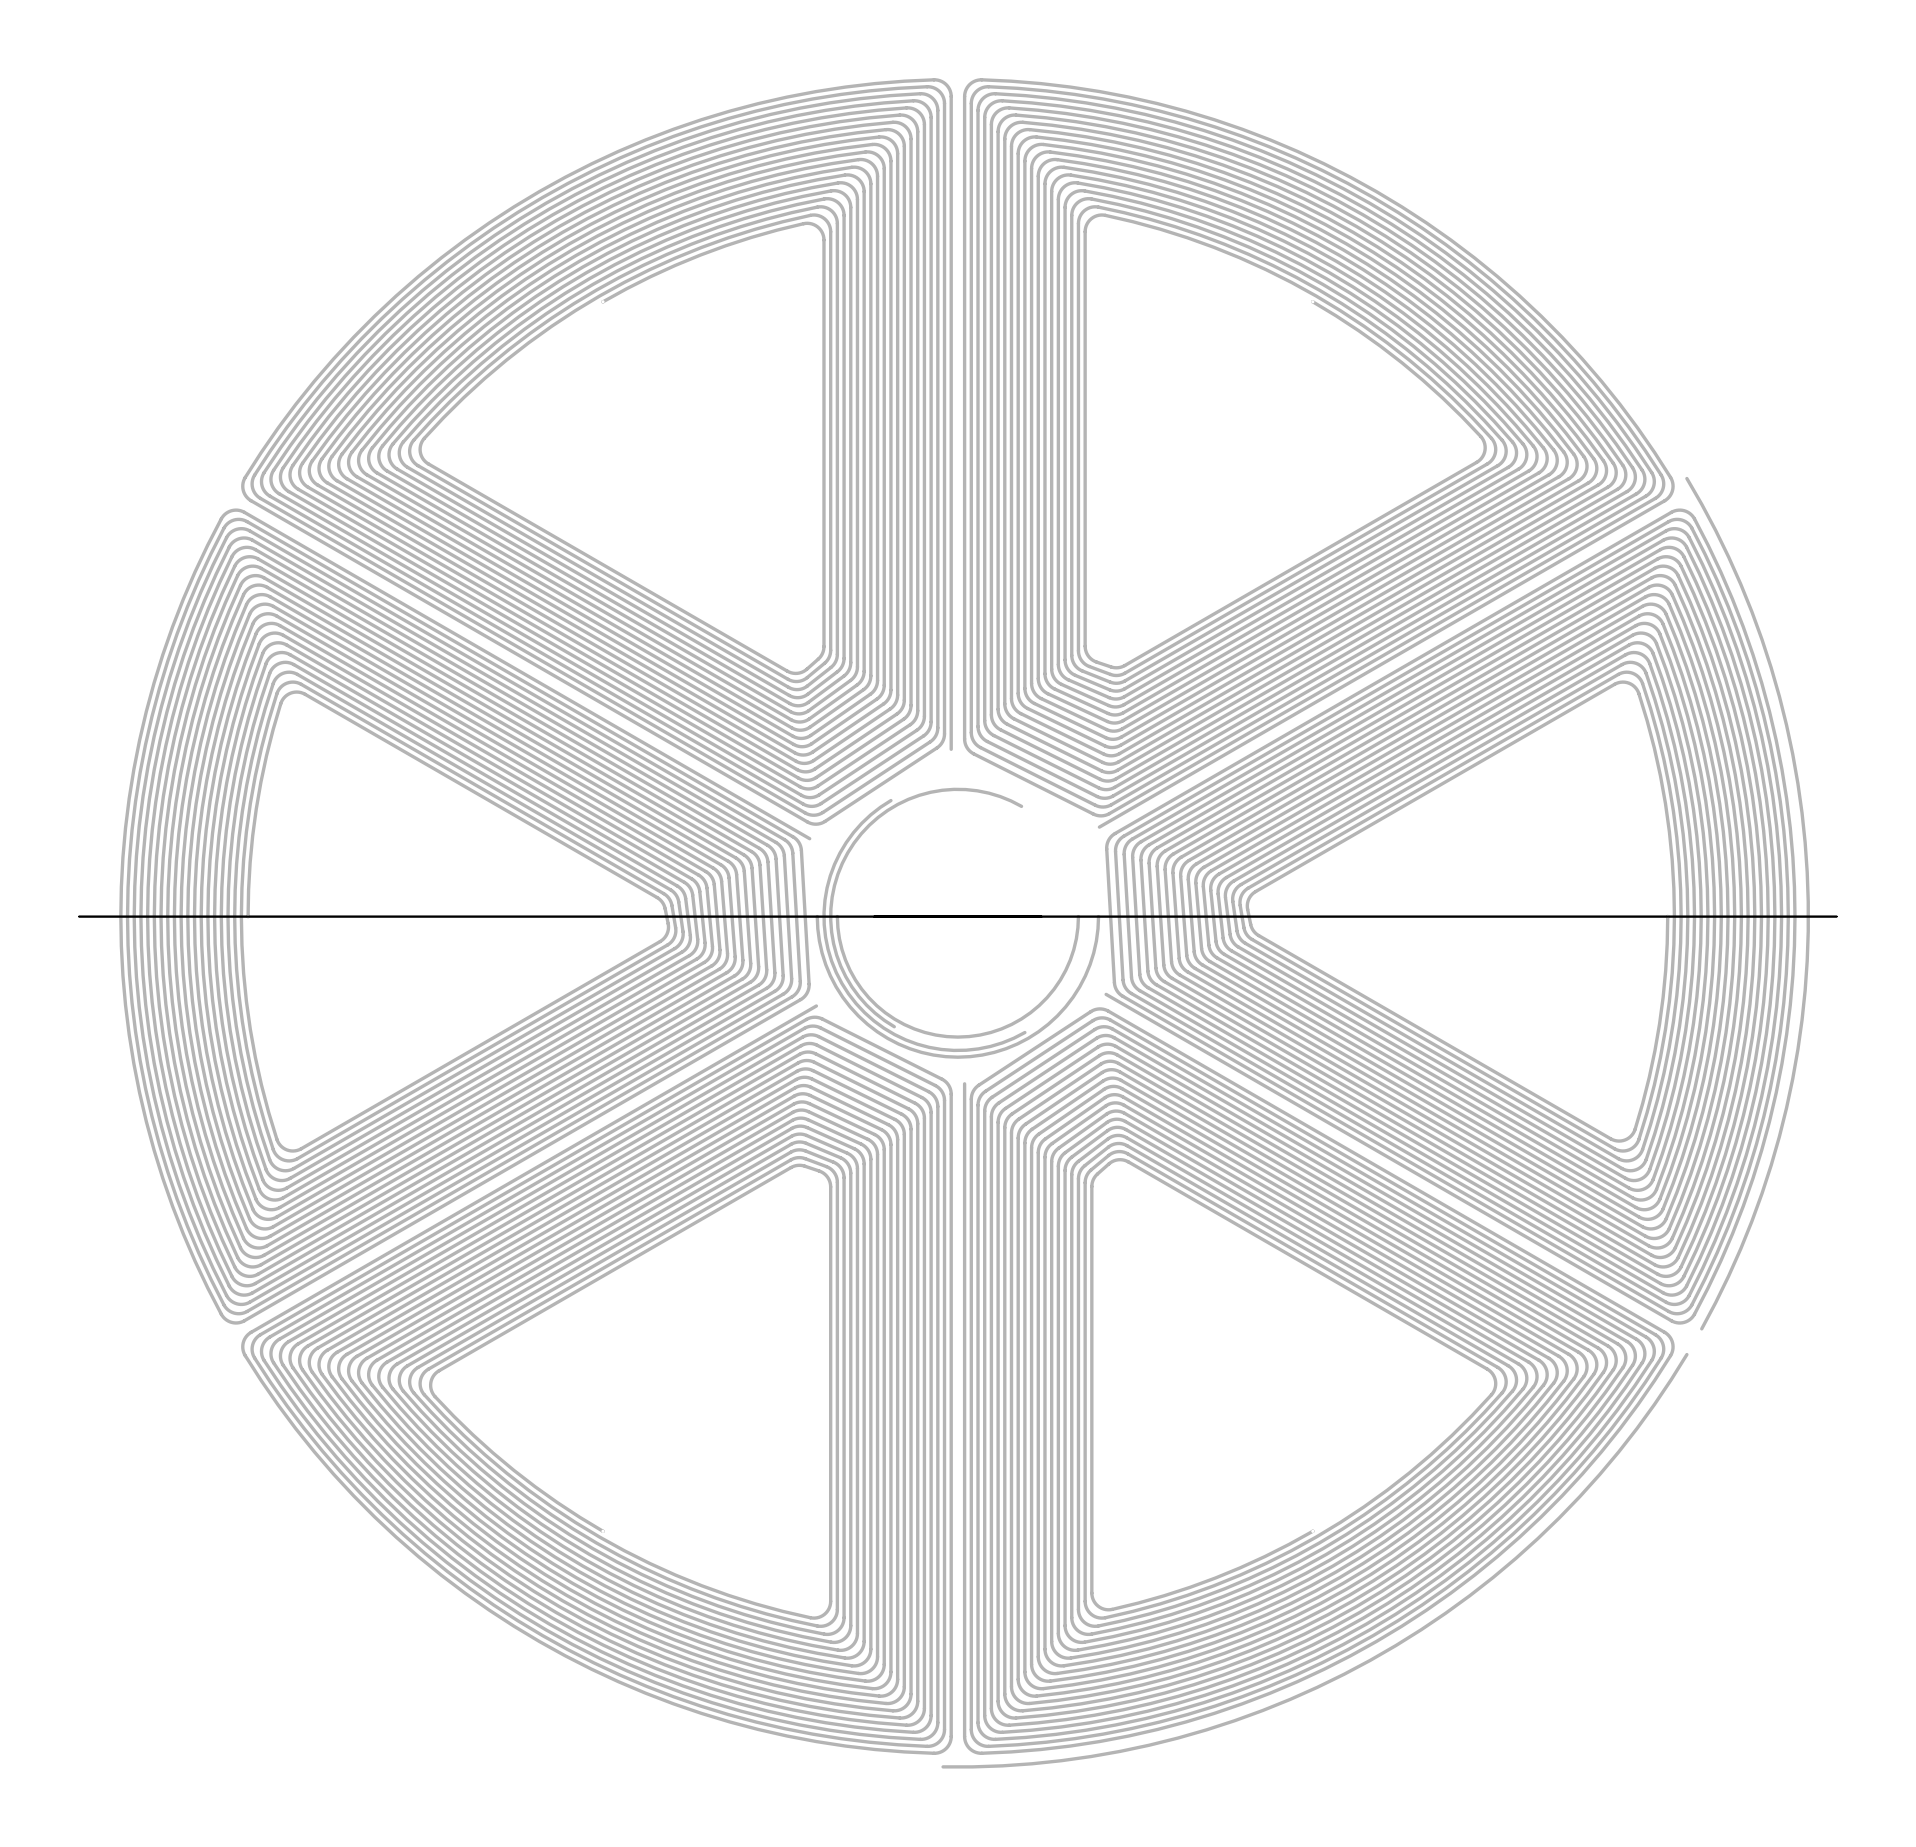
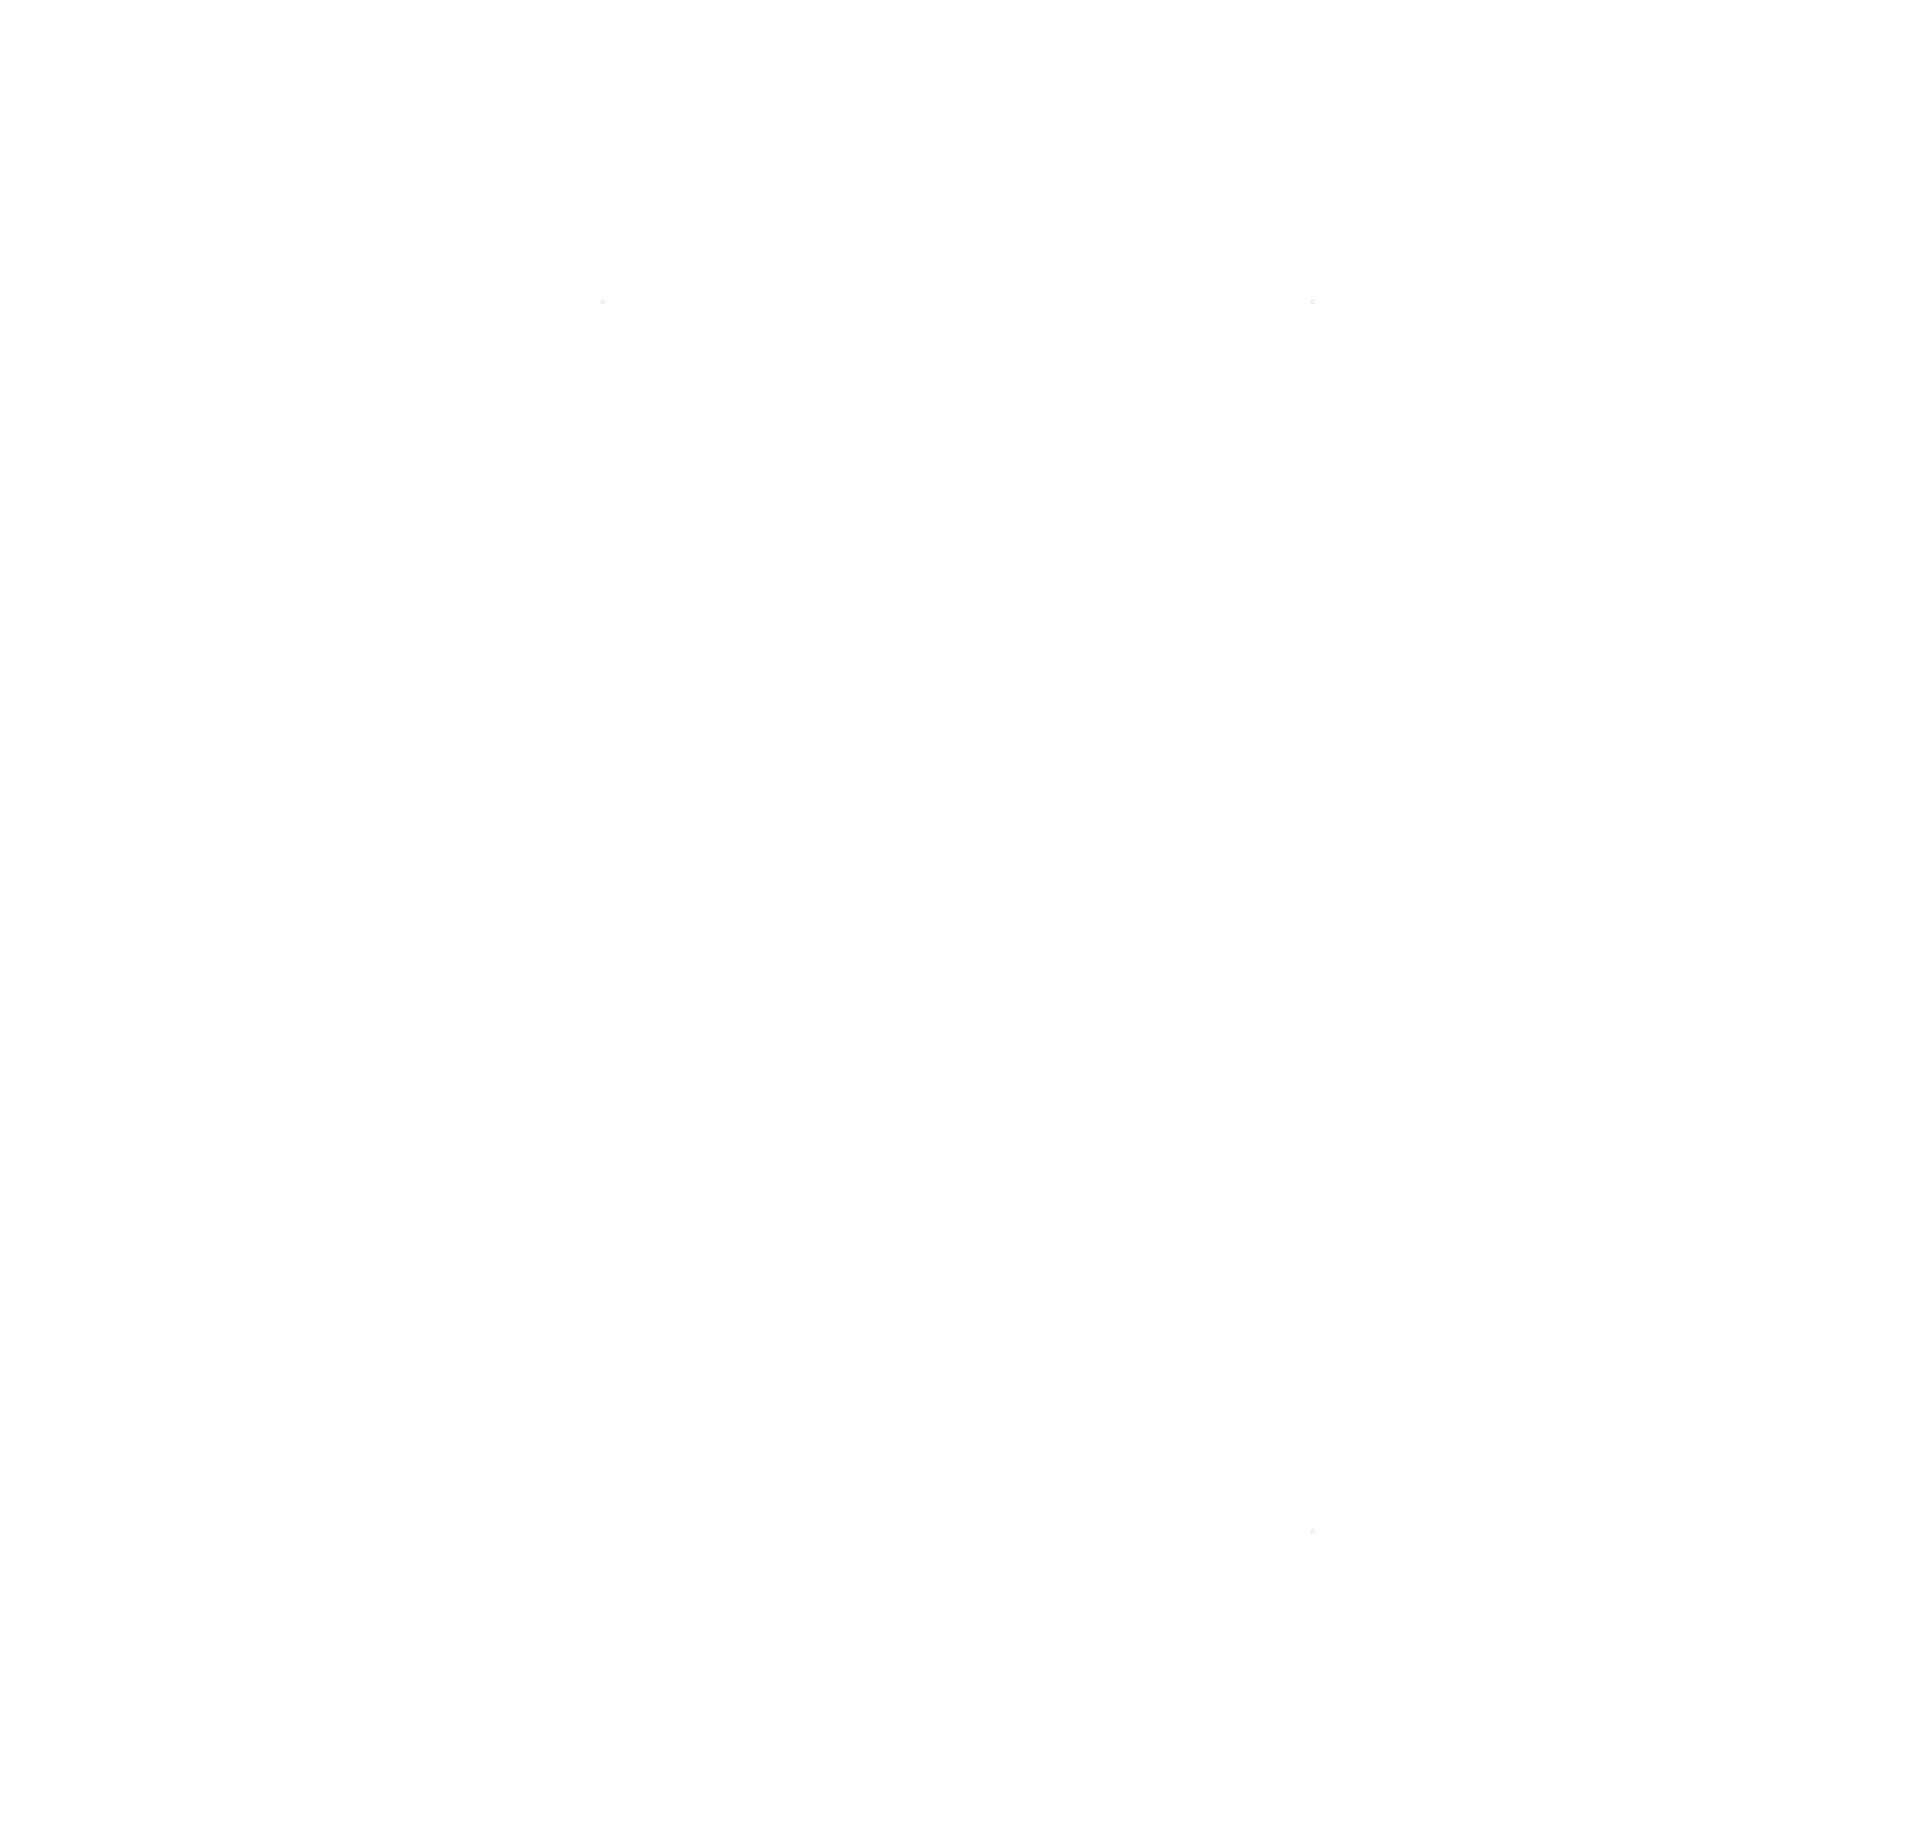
track: (602, 301) (675, 265) (751, 237) (805, 223) (814, 224) (821, 231) (823, 240) (823, 646) (819, 657) (801, 672) (793, 673) (787, 671) (428, 463) (422, 458) (420, 447) (423, 439) (443, 417) (506, 360) (575, 310) (624, 282) (701, 247) (755, 229) (812, 215) (820, 216) (828, 223) (830, 231) (830, 652) (825, 662) (801, 680) (788, 679) (418, 465) (411, 457) (409, 449) (412, 441) (431, 420) (488, 366) (551, 318) (619, 277) (691, 244) (766, 219) (819, 206) (827, 208) (835, 215) (837, 223) (837, 656) (832, 666) (803, 688) (796, 689) (788, 687) (407, 467) (400, 459) (399, 451) (403, 442) (440, 401) (502, 346) (569, 298) (617, 271) (692, 236) (770, 211) (826, 198) (836, 201) (842, 207) (844, 215) (843, 660) (838, 670) (804, 696) (796, 697) (789, 695) (397, 469) (390, 461) (389, 453) (391, 445) (411, 422) (473, 361) (541, 309) (589, 278) (666, 240) (747, 210) (833, 190) (841, 192) (848, 199) (850, 207) (850, 664) (845, 674) (804, 704) (797, 705) (789, 703) (387, 471) (381, 465) (378, 455) (382, 445) (418, 405) (476, 350) (540, 301) (586, 272) (658, 236) (733, 207) (785, 193) (838, 182) (848, 184) (855, 191) (857, 199) (857, 668) (852, 679) (805, 712) (797, 713) (790, 711) (377, 472) (371, 467) (368, 457) (372, 447) (408, 405) (469, 347) (512, 312) (582, 267) (657, 229) (736, 200) (790, 185) (844, 175) (854, 176) (862, 183) (864, 191) (864, 673) (858, 683) (805, 720) (798, 722) (791, 719) (366, 474) (360, 467) (358, 457) (362, 450) (399, 405) (461, 345) (530, 292) (604, 247) (683, 211) (766, 184) (851, 167) (861, 168) (868, 176) (870, 183) (870, 677) (865, 688) (808, 728) (801, 730) (792, 727) (356, 476) (350, 469) (348, 459) (352, 452) (369, 430) (405, 389) (464, 333) (529, 284) (600, 242) (674, 207) (751, 181) (804, 168) (858, 159) (868, 161) (875, 168) (877, 176) (877, 682) (871, 693) (809, 736) (801, 738) (792, 736) (347, 478) (340, 471) (338, 461) (342, 454) (377, 410) (436, 349) (501, 295) (572, 249) (622, 223) (674, 200) (754, 173) (809, 160) (865, 152) (875, 153) (882, 160) (884, 168) (884, 687) (876, 699) (810, 744) (800, 746) (793, 744) (337, 480) (330, 473) (328, 463) (332, 456) (368, 410) (428, 347) (496, 291) (569, 243) (621, 216) (674, 193) (757, 165) (814, 153) (872, 144) (882, 146) (889, 153) (890, 161) (890, 692) (883, 703) (811, 753) (801, 755) (794, 752) (327, 482) (320, 475) (319, 465) (322, 458) (338, 436) (374, 394) (432, 335) (496, 283) (566, 238) (639, 200) (691, 179) (743, 162) (797, 149) (879, 137) (888, 138) (895, 145) (897, 153) (897, 697) (890, 708) (810, 762) (803, 763) (795, 761) (317, 485) (310, 477) (309, 468) (312, 460) (329, 437) (365, 393) (425, 332) (491, 278) (562, 232) (638, 193) (691, 172) (746, 155) (829, 136) (886, 129) (895, 131) (902, 138) (904, 146) (904, 702) (896, 714) (811, 770) (804, 771) (797, 769) (307, 487) (301, 480) (299, 470) (302, 463) (319, 439) (356, 393) (417, 330) (485, 274) (559, 226) (611, 198) (665, 175) (748, 147) (805, 134) (863, 125) (896, 122) (904, 125) (909, 131) (911, 139) (910, 707) (903, 719) (812, 779) (805, 780) (798, 778) (298, 489) (291, 482) (290, 472) (292, 465) (310, 440) (347, 393) (410, 328) (480, 270) (556, 220) (637, 179) (693, 157) (751, 140) (809, 126) (869, 117) (903, 115) (910, 118) (915, 124) (917, 131) (917, 712) (910, 724) (814, 787) (807, 788) (800, 786) (288, 491) (282, 484) (280, 475) (283, 467) (299, 444) (334, 398) (393, 335) (457, 279) (504, 245) (552, 214) (629, 175) (682, 154) (737, 136) (821, 117) (878, 110) (910, 108) (921, 115) (924, 124) (924, 718) (921, 725) (916, 730) (815, 796) (808, 797) (801, 795) (279, 493) (272, 486) (271, 477) (273, 470) (290, 445) (325, 398) (385, 333) (429, 293) (475, 257) (549, 209) (601, 181) (655, 157) (739, 129) (796, 115) (854, 106) (915, 100) (922, 103) (928, 108) (931, 117) (930, 724) (929, 729) (923, 735) (817, 805) (810, 806) (803, 804) (269, 496) (263, 489) (261, 477) (280, 447) (317, 398) (378, 331) (445, 271) (494, 235) (546, 203) (599, 174) (655, 150) (741, 121) (800, 108) (859, 98) (922, 93) (929, 96) (935, 101) (937, 110) (937, 729) (935, 735) (930, 741) (819, 814) (812, 815) (805, 812) (260, 498) (253, 489) (252, 480) (270, 450) (304, 404) (341, 360) (381, 318) (424, 280) (470, 244) (542, 197) (593, 170) (646, 146) (700, 127) (756, 111) (812, 99) (869, 90) (929, 86) (936, 89) (941, 94) (944, 103) (944, 735) (941, 743) (936, 747) (823, 822) (814, 824) (807, 821) (251, 500) (244, 493) (242, 486) (244, 479) (278, 428) (314, 381) (353, 337) (396, 296) (441, 257) (489, 223) (539, 191) (618, 151) (673, 129) (729, 111) (787, 97) (845, 87) (904, 81) (939, 80) (947, 85) (951, 96) (951, 749) -> none
track: (1312, 301) (1380, 346) (1442, 398) (1482, 438) (1485, 448) (1482, 456) (1476, 462) (1124, 665) (1112, 667) (1091, 659) (1087, 654) (1085, 646) (1085, 231) (1087, 223) (1094, 216) (1103, 215) (1132, 221) (1213, 247) (1291, 282) (1340, 310) (1409, 360) (1452, 397) (1492, 439) (1495, 447) (1493, 458) (1487, 463) (1123, 674) (1112, 674) (1084, 663) (1078, 650) (1078, 223) (1081, 213) (1088, 208) (1096, 206) (1124, 212) (1200, 235) (1272, 265) (1342, 303) (1406, 349) (1465, 401) (1503, 441) (1506, 451) (1503, 459) (1497, 465) (1123, 681) (1111, 682) (1078, 669) (1073, 663) (1071, 655) (1071, 215) (1073, 207) (1081, 200) (1091, 198) (1145, 211) (1223, 236) (1298, 271) (1346, 298) (1413, 346) (1475, 401) (1513, 443) (1516, 453) (1514, 461) (1508, 467) (1122, 689) (1111, 690) (1071, 673) (1066, 667) (1065, 659) (1065, 207) (1067, 199) (1074, 192) (1082, 190) (1112, 196) (1195, 219) (1275, 251) (1326, 278) (1398, 325) (1463, 381) (1524, 445) (1526, 455) (1524, 463) (1518, 469) (1122, 697) (1111, 698) (1065, 677) (1060, 672) (1058, 664) (1058, 199) (1061, 189) (1067, 184) (1077, 182) (1130, 193) (1207, 216) (1282, 247) (1329, 272) (1397, 316) (1459, 367) (1497, 405) (1533, 445) (1537, 455) (1534, 465) (1528, 471) (1122, 705) (1110, 706) (1058, 682) (1053, 676) (1051, 669) (1051, 191) (1053, 183) (1060, 176) (1070, 175) (1125, 185) (1206, 208) (1283, 240) (1332, 267) (1402, 312) (1467, 366) (1507, 405) (1543, 447) (1547, 457) (1544, 467) (1538, 472) (1121, 713) (1109, 714) (1051, 687) (1046, 681) (1044, 673) (1044, 183) (1048, 174) (1055, 168) (1064, 167) (1121, 177) (1204, 201) (1285, 234) (1361, 276) (1431, 326) (1496, 384) (1553, 450) (1557, 459) (1554, 469) (1548, 474) (1121, 721) (1109, 722) (1046, 692) (1039, 685) (1038, 678) (1038, 176) (1041, 166) (1049, 160) (1057, 159) (1084, 163) (1137, 174) (1216, 198) (1291, 229) (1363, 269) (1429, 316) (1491, 370) (1529, 410) (1563, 452) (1567, 461) (1564, 471) (1558, 476) (1120, 729) (1108, 730) (1039, 697) (1034, 692) (1031, 683) (1031, 168) (1034, 159) (1042, 152) (1050, 152) (1106, 160) (1188, 181) (1267, 211) (1342, 249) (1390, 279) (1436, 313) (1499, 369) (1538, 410) (1573, 454) (1577, 463) (1574, 473) (1568, 478) (1119, 738) (1105, 737) (1032, 702) (1026, 695) (1024, 688) (1024, 161) (1027, 151) (1035, 145) (1043, 144) (1101, 153) (1186, 174) (1268, 204) (1346, 243) (1419, 291) (1465, 328) (1507, 367) (1547, 410) (1583, 456) (1587, 465) (1584, 475) (1578, 480) (1118, 746) (1104, 745) (1025, 707) (1019, 700) (1018, 693) (1018, 153) (1021, 144) (1028, 138) (1036, 137) (1064, 140) (1118, 149) (1198, 170) (1275, 200) (1349, 238) (1396, 267) (1441, 299) (1503, 354) (1541, 394) (1593, 458) (1596, 467) (1594, 477) (1588, 482) (1117, 754) (1103, 754) (1017, 711) (1013, 705) (1011, 698) (1011, 146) (1014, 136) (1021, 130) (1029, 129) (1058, 132) (1114, 141) (1196, 163) (1276, 193) (1353, 232) (1401, 262) (1447, 296) (1511, 352) (1568, 415) (1603, 460) (1606, 470) (1603, 479) (1598, 485) (1116, 762) (1102, 762) (1011, 716) (1006, 711) (1004, 703) (1004, 139) (1007, 129) (1015, 123) (1022, 122) (1052, 125) (1110, 134) (1195, 155) (1277, 186) (1356, 226) (1406, 257) (1453, 292) (1519, 350) (1559, 393) (1596, 439) (1615, 466) (1616, 474) (1613, 481) (1607, 487) (1115, 771) (1101, 770) (1004, 722) (999, 716) (998, 709) (998, 131) (1000, 122) (1008, 116) (1016, 115) (1046, 117) (1105, 126) (1193, 148) (1278, 179) (1359, 220) (1435, 270) (1482, 307) (1526, 349) (1567, 393) (1605, 440) (1624, 468) (1625, 476) (1623, 484) (1617, 489) (1114, 779) (1100, 779) (997, 727) (993, 722) (991, 714) (991, 124) (994, 115) (1001, 109) (1009, 107) (1037, 110) (1094, 117) (1178, 136) (1233, 154) (1286, 175) (1363, 214) (1411, 245) (1458, 279) (1522, 335) (1562, 377) (1616, 444) (1634, 471) (1633, 484) (1627, 491) (1112, 788) (1104, 789) (1098, 787) (990, 733) (986, 727) (984, 720) (984, 117) (987, 108) (994, 102) (1002, 100) (1031, 102) (1090, 110) (1176, 129) (1260, 157) (1314, 181) (1366, 209) (1416, 240) (1463, 275) (1530, 333) (1570, 376) (1608, 422) (1643, 471) (1644, 479) (1643, 486) (1636, 493) (1111, 796) (1105, 798) (1097, 796) (984, 739) (979, 733) (978, 726) (978, 110) (981, 99) (989, 94) (1025, 95) (1085, 102) (1174, 121) (1232, 139) (1288, 162) (1369, 203) (1421, 235) (1469, 271) (1537, 331) (1579, 375) (1617, 422) (1652, 474) (1654, 481) (1652, 489) (1645, 496) (1109, 805) (1103, 807) (1095, 805) (977, 745) (972, 739) (971, 732) (971, 103) (975, 92) (982, 87) (1017, 88) (1074, 94) (1131, 104) (1187, 118) (1242, 136) (1296, 158) (1373, 197) (1422, 228) (1468, 261) (1512, 298) (1554, 339) (1593, 381) (1628, 427) (1662, 476) (1663, 484) (1661, 491) (1655, 498) (1107, 814) (1099, 815) (1093, 814) (972, 752) (967, 747) (964, 738) (964, 96) (967, 87) (972, 82) (979, 79) (1040, 83) (1099, 91) (1157, 103) (1214, 119) (1270, 139) (1324, 163) (1376, 191) (1450, 240) (1497, 276) (1541, 316) (1582, 358) (1620, 404) (1654, 452) (1672, 482) (1671, 493) (1664, 500) (1099, 827) -> none
track: (1686, 478) (1715, 530) (1740, 584) (1771, 667) (1786, 725) (1797, 783) (1805, 842) (1808, 901) (1805, 990) (1797, 1049) (1786, 1107) (1771, 1165) (1751, 1221) (1728, 1275) (1701, 1328) -> none
track: (890, 800) (870, 814) (853, 832) (839, 853) (830, 875) (824, 900) (825, 937) (831, 961) (841, 983) (856, 1003) (873, 1020) (905, 1039) (929, 1047) (953, 1050) (978, 1048) (1002, 1042) (1024, 1032) -> none
track: (1021, 806) (1000, 796) (977, 790) (953, 789) (930, 792) (908, 799) (887, 810) (869, 825) (847, 852) (837, 874) (832, 897) (831, 932) (836, 955) (845, 976) (858, 996) (875, 1013) (894, 1026) -> none
track: (809, 838) (244, 512) (235, 510) (224, 514) (207, 545) (183, 599) (162, 654) (146, 711) (133, 769) (125, 827) (120, 916) (122, 975) (129, 1034) (139, 1092) (154, 1150) (172, 1206) (195, 1261) (222, 1315) (227, 1320) (235, 1322) (244, 1320) (800, 999) (807, 993) (809, 985) (801, 850) (799, 844) (794, 837) (247, 521) (237, 519) (230, 521) (224, 526) (198, 580) (177, 633) (159, 688) (145, 744) (135, 801) (129, 858) (127, 916) (132, 1002) (140, 1060) (151, 1116) (167, 1172) (187, 1226) (210, 1279) (227, 1309) (237, 1313) (247, 1311) (791, 996) (797, 991) (800, 985) (792, 853) (791, 847) (786, 840) (249, 530) (240, 528) (233, 530) (227, 536) (200, 592) (178, 648) (161, 706) (148, 765) (139, 825) (134, 916) (136, 977) (143, 1037) (161, 1126) (189, 1212) (213, 1268) (230, 1299) (240, 1304) (249, 1302) (783, 994) (788, 989) (791, 982) (784, 855) (782, 849) (777, 843) (252, 540) (243, 538) (235, 540) (230, 545) (204, 600) (183, 655) (166, 712) (154, 769) (145, 828) (140, 916) (145, 1004) (154, 1063) (166, 1120) (193, 1205) (216, 1259) (229, 1285) (234, 1291) (243, 1295) (252, 1292) (774, 991) (780, 986) (782, 979) (776, 858) (773, 851) (769, 846) (255, 549) (245, 547) (234, 553) (219, 582) (197, 635) (172, 717) (155, 802) (149, 859) (147, 916) (149, 973) (155, 1030) (172, 1115) (197, 1197) (219, 1250) (231, 1276) (236, 1282) (245, 1285) (255, 1283) (766, 988) (771, 983) (774, 976) (767, 861) (761, 849) (258, 558) (250, 556) (243, 558) (236, 562) (222, 593) (199, 649) (181, 707) (163, 796) (156, 856) (154, 916) (159, 1007) (174, 1096) (199, 1183) (222, 1239) (234, 1266) (239, 1272) (248, 1276) (258, 1274) (758, 985) (763, 980) (766, 973) (759, 864) (753, 852) (261, 568) (253, 566) (245, 567) (239, 572) (225, 602) (204, 657) (187, 713) (174, 770) (165, 828) (161, 916) (165, 1004) (180, 1091) (204, 1175) (225, 1230) (237, 1257) (242, 1263) (251, 1266) (261, 1264) (750, 982) (755, 977) (758, 970) (752, 868) (745, 855) (264, 577) (256, 575) (247, 578) (240, 585) (218, 637) (192, 719) (180, 774) (172, 831) (167, 916) (172, 1001) (186, 1086) (208, 1168) (229, 1221) (240, 1247) (245, 1253) (254, 1257) (264, 1255) (742, 979) (747, 974) (750, 967) (744, 871) (737, 859) (267, 587) (259, 585) (249, 587) (243, 594) (213, 672) (198, 725) (186, 779) (178, 833) (174, 916) (178, 999) (191, 1081) (213, 1160) (232, 1212) (243, 1238) (248, 1244) (257, 1247) (267, 1245) (734, 975) (740, 970) (742, 962) (736, 874) (729, 862) (270, 596) (262, 594) (252, 597) (246, 604) (225, 658) (207, 714) (194, 771) (186, 829) (181, 916) (186, 1003) (200, 1090) (225, 1174) (246, 1228) (251, 1234) (260, 1238) (270, 1236) (726, 972) (732, 967) (735, 958) (729, 877) (722, 865) (273, 606) (265, 604) (256, 606) (249, 614) (229, 667) (213, 721) (196, 804) (189, 860) (187, 916) (192, 1001) (206, 1084) (229, 1166) (249, 1218) (254, 1225) (263, 1228) (273, 1226) (719, 969) (724, 964) (727, 955) (721, 879) (714, 869) (276, 615) (268, 613) (259, 616) (252, 624) (233, 675) (218, 727) (202, 807) (194, 889) (196, 971) (206, 1052) (225, 1131) (242, 1183) (252, 1209) (257, 1215) (266, 1219) (276, 1217) (711, 965) (717, 960) (720, 951) (713, 882) (707, 872) (279, 625) (272, 623) (262, 626) (255, 633) (228, 716) (210, 801) (201, 887) (203, 974) (215, 1060) (236, 1144) (255, 1199) (260, 1205) (270, 1209) (279, 1207) (704, 962) (709, 957) (712, 950) (706, 886) (700, 876) (283, 635) (275, 633) (265, 635) (259, 643) (240, 696) (226, 750) (212, 832) (207, 916) (209, 972) (220, 1055) (240, 1136) (259, 1189) (265, 1197) (273, 1199) (283, 1197) (696, 959) (702, 953) (705, 946) (699, 889) (693, 879) (286, 645) (278, 642) (269, 645) (262, 653) (245, 704) (232, 756) (218, 836) (214, 916) (218, 997) (226, 1050) (245, 1128) (262, 1179) (269, 1187) (276, 1190) (286, 1188) (689, 955) (695, 950) (697, 943) (692, 893) (686, 883) (290, 654) (282, 652) (274, 654) (266, 661) (241, 745) (226, 830) (221, 916) (226, 1002) (235, 1059) (256, 1142) (266, 1171) (272, 1177) (282, 1180) (290, 1178) (682, 952) (687, 946) (690, 939) (685, 896) (679, 887) (293, 664) (285, 662) (275, 665) (270, 671) (253, 726) (236, 806) (228, 889) (228, 944) (236, 1026) (253, 1107) (269, 1159) (275, 1167) (285, 1170) (293, 1168) (674, 948) (680, 943) (683, 935) (678, 900) (672, 890) (297, 674) (289, 672) (281, 674) (274, 681) (258, 734) (242, 811) (235, 890) (236, 969) (246, 1047) (265, 1124) (274, 1151) (279, 1157) (289, 1160) (297, 1158) (667, 945) (675, 933) (671, 903) (665, 894) (301, 684) (293, 682) (283, 685) (277, 691) (261, 748) (246, 831) (241, 888) (243, 973) (250, 1029) (268, 1112) (277, 1141) (283, 1147) (290, 1150) (301, 1148) (660, 941) (664, 937) (668, 929) (664, 907) (657, 897) (305, 694) (296, 692) (286, 695) (281, 701) (266, 755) (252, 835) (248, 916) -> none
track: (817, 916) (819, 940) (825, 964) (842, 997) (858, 1015) (877, 1031) (909, 1048) (933, 1055) (957, 1057) (982, 1055) (1006, 1048) (1038, 1031) (1057, 1015) (1073, 997) (1090, 964) (1096, 940) (1098, 916) -> none
track: (837, 916) (839, 938) (845, 960) (855, 980) (868, 997) (885, 1012) (914, 1028) (935, 1035) (957, 1037) (980, 1035) (1001, 1028) (1021, 1019) (1039, 1005) (1060, 980) (1070, 960) (1076, 938) (1078, 916) -> none
board edge: (1041, 916) (874, 916) (1041, 916) -> none
track: (1667, 916) (1663, 997) (1649, 1077) (1634, 1131) (1628, 1137) (1618, 1141) (1610, 1138) (1258, 935) (1251, 926) (1247, 903) (1250, 895) (1255, 891) (1614, 684) (1624, 682) (1632, 685) (1638, 691) (1647, 720) (1665, 803) (1672, 859) (1673, 944) (1665, 1029) (1654, 1084) (1638, 1141) (1632, 1147) (1622, 1151) (1614, 1148) (1250, 938) (1244, 929) (1240, 899) (1248, 888) (1618, 674) (1626, 672) (1636, 675) (1641, 681) (1650, 708) (1669, 785) (1679, 863) (1680, 942) (1673, 1021) (1657, 1099) (1641, 1151) (1634, 1158) (1626, 1160) (1618, 1158) (1243, 942) (1237, 933) (1232, 897) (1235, 890) (1241, 884) (1622, 664) (1630, 662) (1639, 665) (1646, 673) (1662, 726) (1679, 806) (1685, 861) (1687, 944) (1679, 1026) (1662, 1107) (1645, 1161) (1638, 1168) (1630, 1170) (1622, 1168) (1236, 945) (1230, 936) (1225, 893) (1228, 886) (1233, 881) (1625, 654) (1633, 652) (1643, 655) (1648, 661) (1659, 690) (1680, 773) (1692, 859) (1694, 916) (1689, 1002) (1674, 1087) (1648, 1171) (1641, 1178) (1633, 1180) (1625, 1178) (1229, 949) (1223, 940) (1218, 890) (1220, 882) (1226, 877) (1629, 645) (1637, 642) (1646, 645) (1653, 653) (1670, 704) (1689, 782) (1696, 836) (1701, 916) (1696, 997) (1683, 1076) (1670, 1128) (1653, 1179) (1646, 1187) (1637, 1190) (1629, 1188) (1222, 953) (1216, 943) (1210, 886) (1213, 879) (1219, 874) (1632, 635) (1640, 633) (1650, 635) (1656, 643) (1674, 696) (1694, 777) (1703, 832) (1707, 916) (1703, 1000) (1689, 1082) (1674, 1136) (1656, 1189) (1650, 1197) (1640, 1200) (1632, 1197) (1215, 956) (1209, 947) (1203, 882) (1206, 875) (1211, 870) (1635, 625) (1645, 623) (1655, 627) (1659, 633) (1679, 688) (1700, 772) (1712, 858) (1714, 945) (1705, 1031) (1687, 1116) (1659, 1199) (1653, 1207) (1643, 1209) (1635, 1207) (1208, 960) (1201, 950) (1195, 881) (1197, 873) (1204, 867) (1639, 615) (1649, 613) (1658, 617) (1663, 624) (1673, 649) (1690, 701) (1709, 780) (1719, 862) (1720, 943) (1713, 1025) (1697, 1105) (1682, 1157) (1663, 1209) (1656, 1216) (1646, 1219) (1639, 1217) (1200, 963) (1194, 953) (1188, 877) (1191, 868) (1196, 863) (1642, 606) (1652, 604) (1661, 607) (1666, 614) (1686, 667) (1709, 748) (1723, 832) (1728, 916) (1725, 972) (1719, 1029) (1702, 1112) (1686, 1166) (1666, 1218) (1659, 1226) (1650, 1228) (1642, 1226) (1193, 967) (1186, 955) (1180, 874) (1183, 865) (1188, 860) (1645, 596) (1655, 594) (1664, 598) (1669, 604) (1690, 658) (1715, 742) (1729, 829) (1734, 916) (1729, 1003) (1721, 1061) (1708, 1118) (1690, 1174) (1669, 1228) (1662, 1235) (1653, 1238) (1645, 1236) (1185, 970) (1179, 958) (1172, 871) (1175, 862) (1181, 857) (1648, 587) (1658, 585) (1667, 588) (1672, 594) (1683, 620) (1702, 672) (1723, 752) (1737, 833) (1741, 916) (1739, 971) (1733, 1026) (1717, 1107) (1702, 1160) (1672, 1238) (1665, 1245) (1656, 1248) (1648, 1245) (1178, 973) (1171, 961) (1165, 865) (1168, 859) (1173, 853) (1651, 577) (1661, 575) (1670, 579) (1675, 585) (1686, 611) (1706, 664) (1729, 746) (1743, 831) (1748, 916) (1743, 1001) (1735, 1058) (1723, 1113) (1697, 1195) (1675, 1247) (1668, 1255) (1659, 1257) (1651, 1255) (1170, 977) (1163, 964) (1157, 862) (1160, 855) (1165, 850) (1654, 568) (1664, 566) (1673, 569) (1678, 575) (1690, 602) (1711, 657) (1735, 741) (1749, 828) (1754, 916) (1749, 1004) (1741, 1062) (1728, 1119) (1711, 1175) (1690, 1230) (1676, 1260) (1669, 1265) (1662, 1266) (1654, 1264) (1162, 980) (1155, 968) (1149, 859) (1152, 852) (1157, 847) (1657, 558) (1667, 556) (1676, 560) (1681, 566) (1693, 593) (1715, 649) (1741, 736) (1756, 826) (1761, 916) (1756, 1007) (1747, 1066) (1733, 1125) (1715, 1183) (1693, 1239) (1678, 1270) (1672, 1274) (1665, 1276) (1657, 1274) (1154, 983) (1147, 971) (1141, 856) (1143, 849) (1149, 844) (1660, 549) (1669, 547) (1678, 550) (1683, 556) (1696, 582) (1717, 635) (1743, 717) (1755, 773) (1763, 830) (1768, 916) (1766, 973) (1760, 1030) (1743, 1115) (1717, 1197) (1696, 1250) (1681, 1279) (1669, 1285) (1660, 1283) (1146, 986) (1142, 982) (1139, 974) (1132, 853) (1135, 846) (1140, 841) (1663, 540) (1672, 538) (1681, 541) (1686, 547) (1699, 573) (1722, 628) (1748, 712) (1761, 769) (1770, 828) (1774, 916) (1770, 1004) (1761, 1063) (1748, 1120) (1732, 1177) (1711, 1232) (1685, 1287) (1680, 1292) (1672, 1295) (1663, 1292) (1138, 989) (1132, 983) (1131, 977) (1124, 850) (1127, 843) (1132, 838) (1666, 530) (1675, 528) (1685, 533) (1702, 564) (1726, 620) (1754, 706) (1767, 765) (1776, 825) (1781, 916) (1776, 1007) (1767, 1067) (1754, 1126) (1736, 1184) (1715, 1240) (1688, 1297) (1682, 1302) (1675, 1304) (1666, 1302) (1129, 992) (1124, 985) (1123, 979) (1115, 847) (1118, 841) (1123, 836) (1668, 521) (1679, 519) (1688, 523) (1704, 554) (1728, 606) (1747, 661) (1763, 716) (1780, 801) (1786, 858) (1788, 916) (1786, 974) (1780, 1031) (1770, 1088) (1756, 1144) (1738, 1199) (1717, 1252) (1690, 1306) (1685, 1311) (1677, 1313) (1668, 1311) (1121, 995) (1115, 988) (1114, 982) (1106, 847) (1109, 838) (1115, 833) (1671, 512) (1680, 510) (1687, 512) (1693, 517) (1720, 571) (1743, 626) (1761, 682) (1776, 740) (1786, 798) (1792, 857) (1794, 916) (1790, 1005) (1781, 1063) (1769, 1121) (1752, 1178) (1732, 1233) (1708, 1287) (1690, 1318) (1680, 1322) (1671, 1320) (1106, 994) -> none
board edge: (1836, 916) (78, 916) (1836, 916) -> none
track: (816, 1005) (251, 1332) (244, 1339) (243, 1350) (261, 1380) (295, 1428) (333, 1474) (374, 1516) (418, 1556) (464, 1593) (539, 1641) (591, 1669) (645, 1693) (701, 1713) (758, 1729) (816, 1741) (874, 1749) (935, 1753) (943, 1750) (948, 1745) (951, 1736) (951, 1094) (948, 1085) (943, 1080) (822, 1019) (816, 1017) (808, 1018) (260, 1334) (253, 1341) (252, 1348) (253, 1356) (287, 1405) (322, 1451) (361, 1494) (402, 1534) (447, 1571) (493, 1605) (542, 1635) (619, 1674) (673, 1696) (728, 1714) (784, 1728) (840, 1738) (898, 1744) (932, 1745) (940, 1740) (944, 1729) (944, 1100) (942, 1093) (938, 1087) (820, 1027) (812, 1026) (806, 1027) (269, 1336) (263, 1343) (261, 1351) (263, 1358) (298, 1410) (336, 1457) (378, 1501) (445, 1561) (494, 1597) (546, 1629) (627, 1670) (683, 1693) (741, 1711) (829, 1730) (890, 1737) (926, 1738) (933, 1733) (937, 1722) (937, 1106) (936, 1099) (931, 1093) (818, 1036) (810, 1034) (804, 1036) (279, 1339) (272, 1346) (270, 1353) (272, 1361) (307, 1411) (344, 1456) (385, 1499) (451, 1557) (499, 1592) (549, 1624) (601, 1651) (655, 1675) (739, 1703) (825, 1722) (884, 1730) (913, 1732) (921, 1730) (928, 1724) (931, 1715) (931, 1112) (929, 1105) (924, 1099) (817, 1045) (811, 1043) (803, 1044) (288, 1341) (282, 1348) (281, 1361) (299, 1388) (353, 1456) (393, 1497) (457, 1554) (504, 1587) (552, 1618) (603, 1645) (655, 1668) (737, 1696) (821, 1715) (878, 1722) (906, 1725) (914, 1723) (921, 1717) (924, 1708) (924, 1118) (922, 1111) (918, 1105) (815, 1053) (801, 1053) (298, 1343) (292, 1349) (290, 1356) (291, 1364) (310, 1392) (347, 1439) (388, 1483) (433, 1525) (480, 1562) (556, 1612) (637, 1653) (721, 1684) (809, 1706) (869, 1715) (899, 1718) (907, 1716) (914, 1710) (917, 1701) (917, 1123) (916, 1116) (911, 1110) (814, 1062) (800, 1061) (307, 1345) (302, 1351) (299, 1358) (300, 1366) (319, 1393) (356, 1439) (396, 1482) (462, 1540) (509, 1575) (559, 1606) (637, 1646) (720, 1677) (805, 1698) (863, 1707) (892, 1710) (900, 1709) (908, 1703) (911, 1694) (911, 1129) (909, 1121) (904, 1116) (813, 1070) (799, 1070) (317, 1348) (311, 1353) (309, 1362) (312, 1372) (346, 1417) (404, 1480) (446, 1518) (491, 1554) (562, 1600) (638, 1639) (718, 1669) (801, 1691) (857, 1700) (886, 1703) (893, 1702) (901, 1696) (904, 1686) (904, 1134) (902, 1127) (898, 1121) (811, 1078) (798, 1078) (327, 1350) (321, 1355) (319, 1365) (322, 1374) (374, 1439) (412, 1478) (474, 1533) (519, 1565) (566, 1595) (639, 1632) (717, 1662) (797, 1683) (851, 1692) (879, 1696) (887, 1694) (894, 1688) (897, 1679) (897, 1139) (895, 1132) (889, 1125) (810, 1087) (797, 1086) (337, 1352) (331, 1357) (328, 1367) (332, 1376) (368, 1422) (407, 1465) (450, 1504) (496, 1541) (569, 1589) (647, 1628) (729, 1659) (814, 1680) (872, 1688) (880, 1687) (888, 1681) (890, 1671) (890, 1144) (889, 1137) (883, 1130) (810, 1095) (796, 1095) (347, 1354) (341, 1359) (338, 1369) (342, 1378) (377, 1422) (416, 1463) (479, 1520) (525, 1553) (572, 1583) (648, 1621) (727, 1651) (809, 1672) (865, 1681) (873, 1680) (881, 1673) (884, 1664) (884, 1149) (881, 1140) (876, 1135) (807, 1102) (795, 1103) (356, 1356) (351, 1361) (348, 1371) (352, 1380) (386, 1423) (424, 1462) (485, 1516) (552, 1563) (624, 1603) (699, 1635) (778, 1658) (831, 1669) (858, 1673) (866, 1672) (874, 1666) (877, 1656) (877, 1154) (875, 1147) (869, 1140) (806, 1110) (794, 1111) (366, 1358) (361, 1363) (358, 1373) (362, 1383) (419, 1448) (484, 1506) (554, 1556) (630, 1598) (711, 1631) (794, 1655) (851, 1665) (859, 1664) (867, 1658) (870, 1649) (870, 1159) (869, 1151) (864, 1146) (805, 1118) (794, 1119) (377, 1360) (371, 1365) (368, 1375) (372, 1385) (408, 1427) (448, 1466) (512, 1520) (582, 1566) (632, 1592) (709, 1624) (790, 1647) (844, 1658) (854, 1656) (862, 1649) (864, 1641) (864, 1163) (862, 1156) (857, 1150) (805, 1126) (793, 1127) (387, 1362) (381, 1367) (378, 1377) (382, 1387) (418, 1427) (456, 1465) (518, 1516) (586, 1560) (658, 1596) (708, 1616) (785, 1639) (838, 1650) (848, 1648) (854, 1643) (857, 1633) (857, 1168) (855, 1161) (850, 1155) (804, 1134) (793, 1135) (397, 1363) (391, 1369) (389, 1377) (391, 1387) (451, 1451) (517, 1507) (589, 1554) (640, 1581) (720, 1613) (802, 1636) (833, 1642) (841, 1640) (848, 1633) (850, 1625) (850, 1173) (848, 1165) (843, 1159) (804, 1142) (792, 1143) (407, 1365) (401, 1371) (399, 1379) (402, 1389) (440, 1431) (502, 1486) (569, 1534) (641, 1574) (692, 1596) (770, 1622) (824, 1634) (834, 1632) (842, 1625) (844, 1617) (844, 1177) (842, 1170) (837, 1164) (803, 1150) (792, 1151) (418, 1367) (412, 1373) (409, 1381) (412, 1391) (449, 1431) (509, 1483) (573, 1529) (642, 1567) (715, 1598) (791, 1620) (819, 1626) (827, 1624) (834, 1619) (837, 1609) (837, 1182) (831, 1169) (803, 1158) (792, 1159) (428, 1369) (422, 1375) (420, 1385) (423, 1393) (463, 1435) (528, 1490) (575, 1522) (624, 1550) (701, 1585) (782, 1611) (812, 1618) (820, 1616) (828, 1609) (830, 1601) (830, 1186) (828, 1178) (824, 1174) (803, 1165) (791, 1167) (438, 1370) (432, 1376) (430, 1384) (433, 1394) (473, 1434) (535, 1486) (602, 1531) -> none
track: (964, 1083) (964, 1736) (968, 1747) (976, 1752) (1011, 1751) (1070, 1746) (1128, 1736) (1186, 1721) (1242, 1703) (1297, 1681) (1376, 1641) (1426, 1610) (1474, 1575) (1519, 1537) (1562, 1495) (1601, 1451) (1637, 1404) (1671, 1353) (1673, 1346) (1671, 1339) (1664, 1332) (1108, 1011) (1101, 1008) (1092, 1010) (978, 1085) (974, 1089) (971, 1097) (971, 1729) (973, 1738) (979, 1744) (986, 1746) (1046, 1742) (1103, 1734) (1159, 1722) (1215, 1706) (1269, 1686) (1322, 1662) (1373, 1635) (1422, 1605) (1468, 1571) (1534, 1514) (1574, 1473) (1611, 1428) (1645, 1382) (1663, 1352) (1662, 1343) (1655, 1334) (1110, 1020) (1103, 1017) (1096, 1018) (985, 1091) (980, 1097) (978, 1103) (978, 1722) (980, 1731) (986, 1737) (993, 1739) (1055, 1734) (1115, 1724) (1174, 1711) (1232, 1693) (1288, 1670) (1369, 1629) (1421, 1597) (1469, 1561) (1537, 1501) (1598, 1434) (1634, 1385) (1653, 1355) (1652, 1343) (1645, 1337) (1112, 1028) (1105, 1026) (1098, 1027) (992, 1097) (987, 1101) (984, 1109) (984, 1715) (987, 1724) (993, 1730) (1000, 1732) (1061, 1726) (1119, 1717) (1176, 1703) (1260, 1675) (1314, 1651) (1366, 1624) (1440, 1575) (1486, 1539) (1530, 1499) (1589, 1434) (1625, 1387) (1642, 1362) (1644, 1355) (1643, 1346) (1636, 1339) (1114, 1037) (1107, 1035) (1099, 1036) (998, 1102) (994, 1107) (991, 1114) (991, 1708) (994, 1717) (1005, 1725) (1037, 1722) (1094, 1715) (1178, 1696) (1233, 1678) (1286, 1657) (1363, 1618) (1411, 1587) (1458, 1554) (1522, 1497) (1581, 1434) (1616, 1388) (1632, 1365) (1635, 1358) (1633, 1348) (1627, 1341) (1115, 1046) (1108, 1044) (1101, 1045) (1005, 1108) (998, 1120) (998, 1701) (999, 1708) (1004, 1714) (1012, 1717) (1046, 1715) (1105, 1706) (1164, 1693) (1250, 1664) (1306, 1640) (1359, 1612) (1435, 1562) (1505, 1504) (1567, 1439) (1605, 1392) (1622, 1367) (1625, 1360) (1624, 1350) (1617, 1343) (1117, 1054) (1110, 1052) (1102, 1053) (1012, 1113) (1004, 1125) (1004, 1694) (1006, 1701) (1011, 1707) (1018, 1710) (1052, 1707) (1110, 1698) (1167, 1685) (1250, 1657) (1304, 1634) (1356, 1606) (1430, 1558) (1497, 1502) (1559, 1439) (1596, 1393) (1613, 1369) (1616, 1362) (1614, 1353) (1607, 1345) (1118, 1063) (1111, 1061) (1104, 1062) (1018, 1119) (1011, 1130) (1011, 1686) (1013, 1694) (1020, 1701) (1029, 1703) (1086, 1696) (1169, 1677) (1250, 1650) (1302, 1627) (1353, 1600) (1424, 1554) (1490, 1500) (1550, 1439) (1586, 1395) (1603, 1372) (1606, 1364) (1604, 1355) (1598, 1348) (1119, 1071) (1112, 1069) (1105, 1070) (1025, 1124) (1018, 1136) (1018, 1679) (1020, 1687) (1026, 1694) (1036, 1696) (1091, 1688) (1172, 1670) (1250, 1643) (1300, 1620) (1349, 1595) (1419, 1549) (1483, 1497) (1541, 1439) (1577, 1396) (1593, 1374) (1596, 1367) (1595, 1357) (1588, 1350) (1120, 1080) (1113, 1078) (1104, 1079) (1032, 1129) (1025, 1141) (1024, 1671) (1026, 1679) (1033, 1686) (1043, 1688) (1101, 1680) (1158, 1667) (1241, 1639) (1294, 1616) (1346, 1589) (1419, 1541) (1486, 1485) (1547, 1422) (1583, 1376) (1586, 1369) (1585, 1359) (1578, 1352) (1122, 1088) (1113, 1086) (1105, 1088) (1038, 1134) (1031, 1145) (1031, 1664) (1033, 1672) (1040, 1679) (1050, 1681) (1106, 1672) (1161, 1659) (1214, 1642) (1267, 1621) (1342, 1583) (1413, 1537) (1479, 1483) (1538, 1422) (1573, 1378) (1576, 1371) (1575, 1361) (1568, 1354) (1122, 1096) (1113, 1094) (1106, 1096) (1043, 1140) (1038, 1150) (1038, 1656) (1040, 1664) (1047, 1671) (1057, 1673) (1111, 1664) (1164, 1651) (1241, 1625) (1315, 1590) (1385, 1548) (1451, 1499) (1510, 1443) (1546, 1402) (1563, 1380) (1567, 1373) (1565, 1363) (1558, 1356) (1123, 1105) (1114, 1102) (1107, 1104) (1050, 1144) (1045, 1155) (1044, 1649) (1046, 1657) (1054, 1664) (1064, 1665) (1149, 1648) (1231, 1621) (1310, 1585) (1385, 1541) (1454, 1487) (1516, 1427) (1553, 1383) (1556, 1375) (1555, 1365) (1548, 1358) (1124, 1113) (1117, 1111) (1109, 1112) (1057, 1149) (1051, 1159) (1051, 1641) (1053, 1649) (1060, 1656) (1070, 1658) (1125, 1647) (1179, 1633) (1258, 1603) (1332, 1566) (1402, 1520) (1446, 1485) (1507, 1427) (1543, 1385) (1547, 1375) (1544, 1365) (1538, 1360) (1125, 1121) (1117, 1119) (1110, 1120) (1063, 1153) (1058, 1164) (1058, 1633) (1060, 1641) (1067, 1648) (1077, 1650) (1130, 1639) (1182, 1625) (1257, 1596) (1329, 1560) (1375, 1531) (1439, 1482) (1497, 1427) (1533, 1387) (1537, 1377) (1534, 1367) (1528, 1362) (1125, 1129) (1118, 1127) (1111, 1128) (1070, 1158) (1065, 1168) (1065, 1625) (1067, 1633) (1074, 1640) (1082, 1642) (1168, 1622) (1249, 1593) (1326, 1554) (1398, 1507) (1442, 1471) (1504, 1410) (1524, 1387) (1526, 1379) (1525, 1371) (1518, 1363) (1126, 1137) (1119, 1135) (1111, 1136) (1076, 1162) (1071, 1172) (1071, 1617) (1073, 1625) (1079, 1631) (1089, 1634) (1145, 1622) (1223, 1596) (1298, 1562) (1369, 1519) (1413, 1486) (1475, 1431) (1512, 1391) (1516, 1381) (1515, 1373) (1508, 1365) (1127, 1145) (1119, 1143) (1111, 1145) (1083, 1166) (1078, 1176) (1078, 1609) (1080, 1617) (1088, 1624) (1096, 1626) (1149, 1613) (1224, 1588) (1296, 1555) (1364, 1514) (1427, 1466) (1484, 1412) (1503, 1391) (1506, 1383) (1503, 1373) (1497, 1367) (1127, 1153) (1114, 1152) (1089, 1171) (1085, 1180) (1085, 1601) (1087, 1609) (1094, 1616) (1103, 1618) (1160, 1603) (1240, 1575) (1291, 1550) (1340, 1522) (1409, 1472) (1472, 1415) (1492, 1393) (1495, 1385) (1493, 1375) (1487, 1369) (1128, 1161) (1122, 1159) (1114, 1160) (1096, 1175) (1091, 1186) (1091, 1593) (1093, 1601) (1101, 1608) (1110, 1609) (1164, 1595) (1240, 1567) (1312, 1531) -> none
track: (1686, 1354) (1654, 1404) (1618, 1451) (1579, 1496) (1537, 1538) (1493, 1577) (1445, 1613) (1370, 1660) (1290, 1699) (1234, 1720) (1178, 1738) (1120, 1751) (1061, 1760) (1002, 1765) (943, 1766) -> none
via: (602, 1531) -> none

